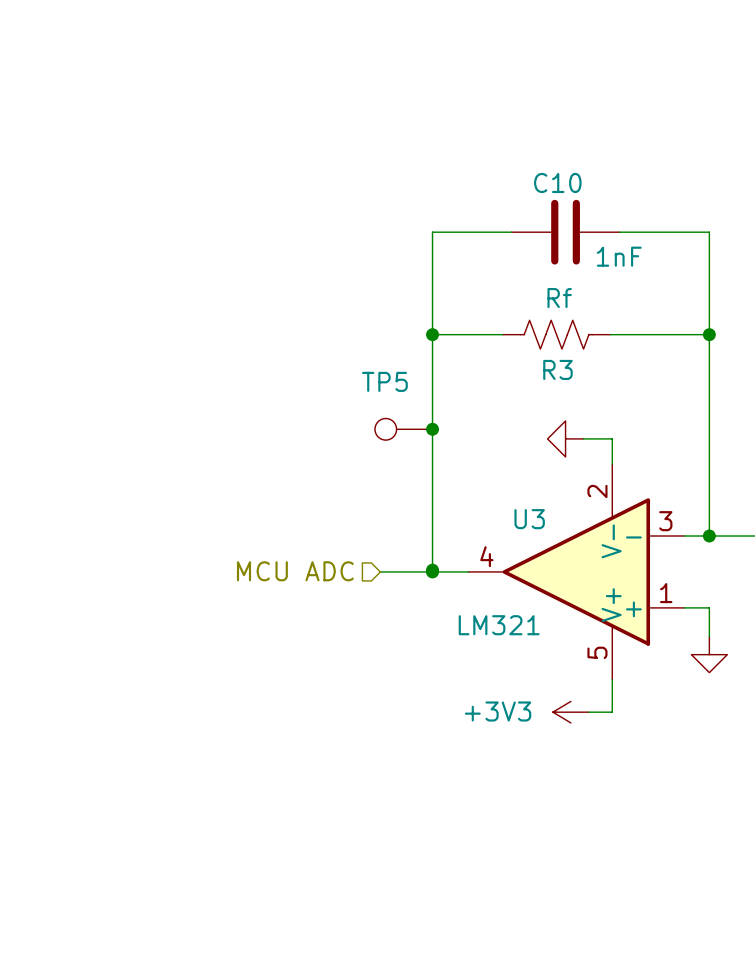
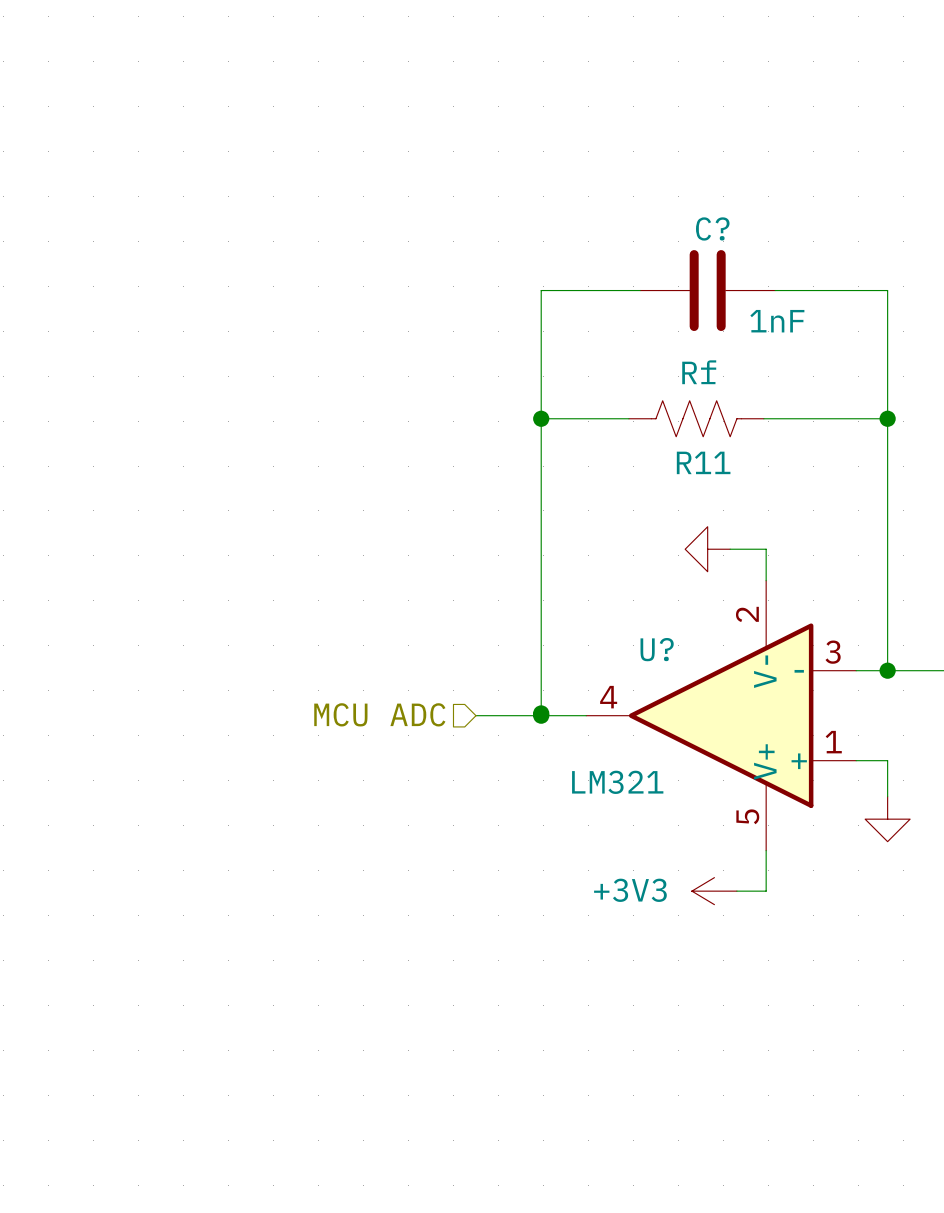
C10 name: C10 (557, 182) -> C? (712, 228)
R3 name: R3 (557, 369) -> R11 (703, 462)
TP5: (403, 429) -> none
junction: (432, 429) -> none
U3 name: U3 (529, 519) -> U? (657, 649)

